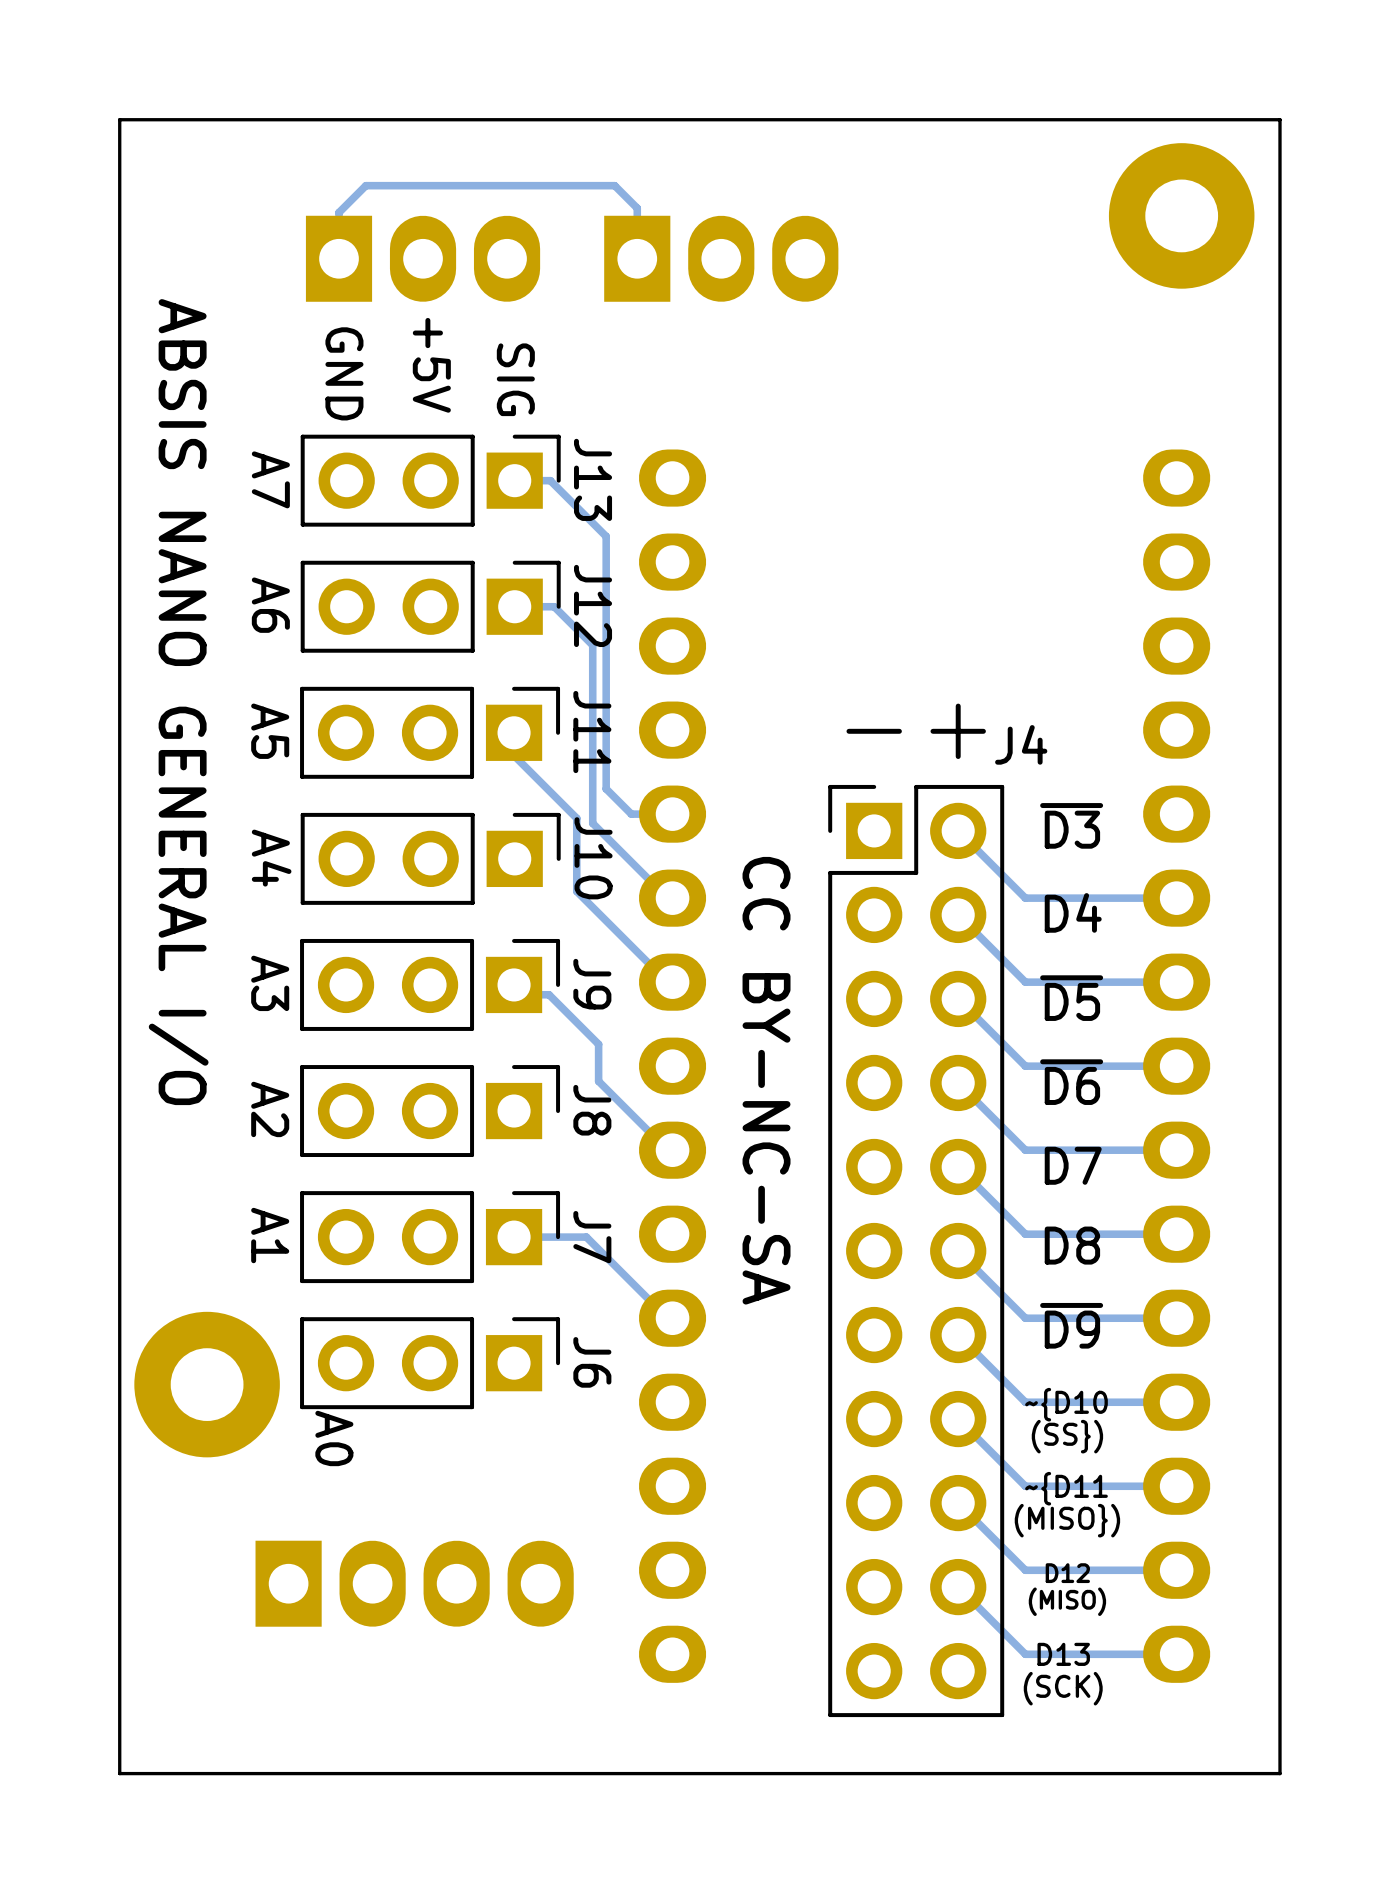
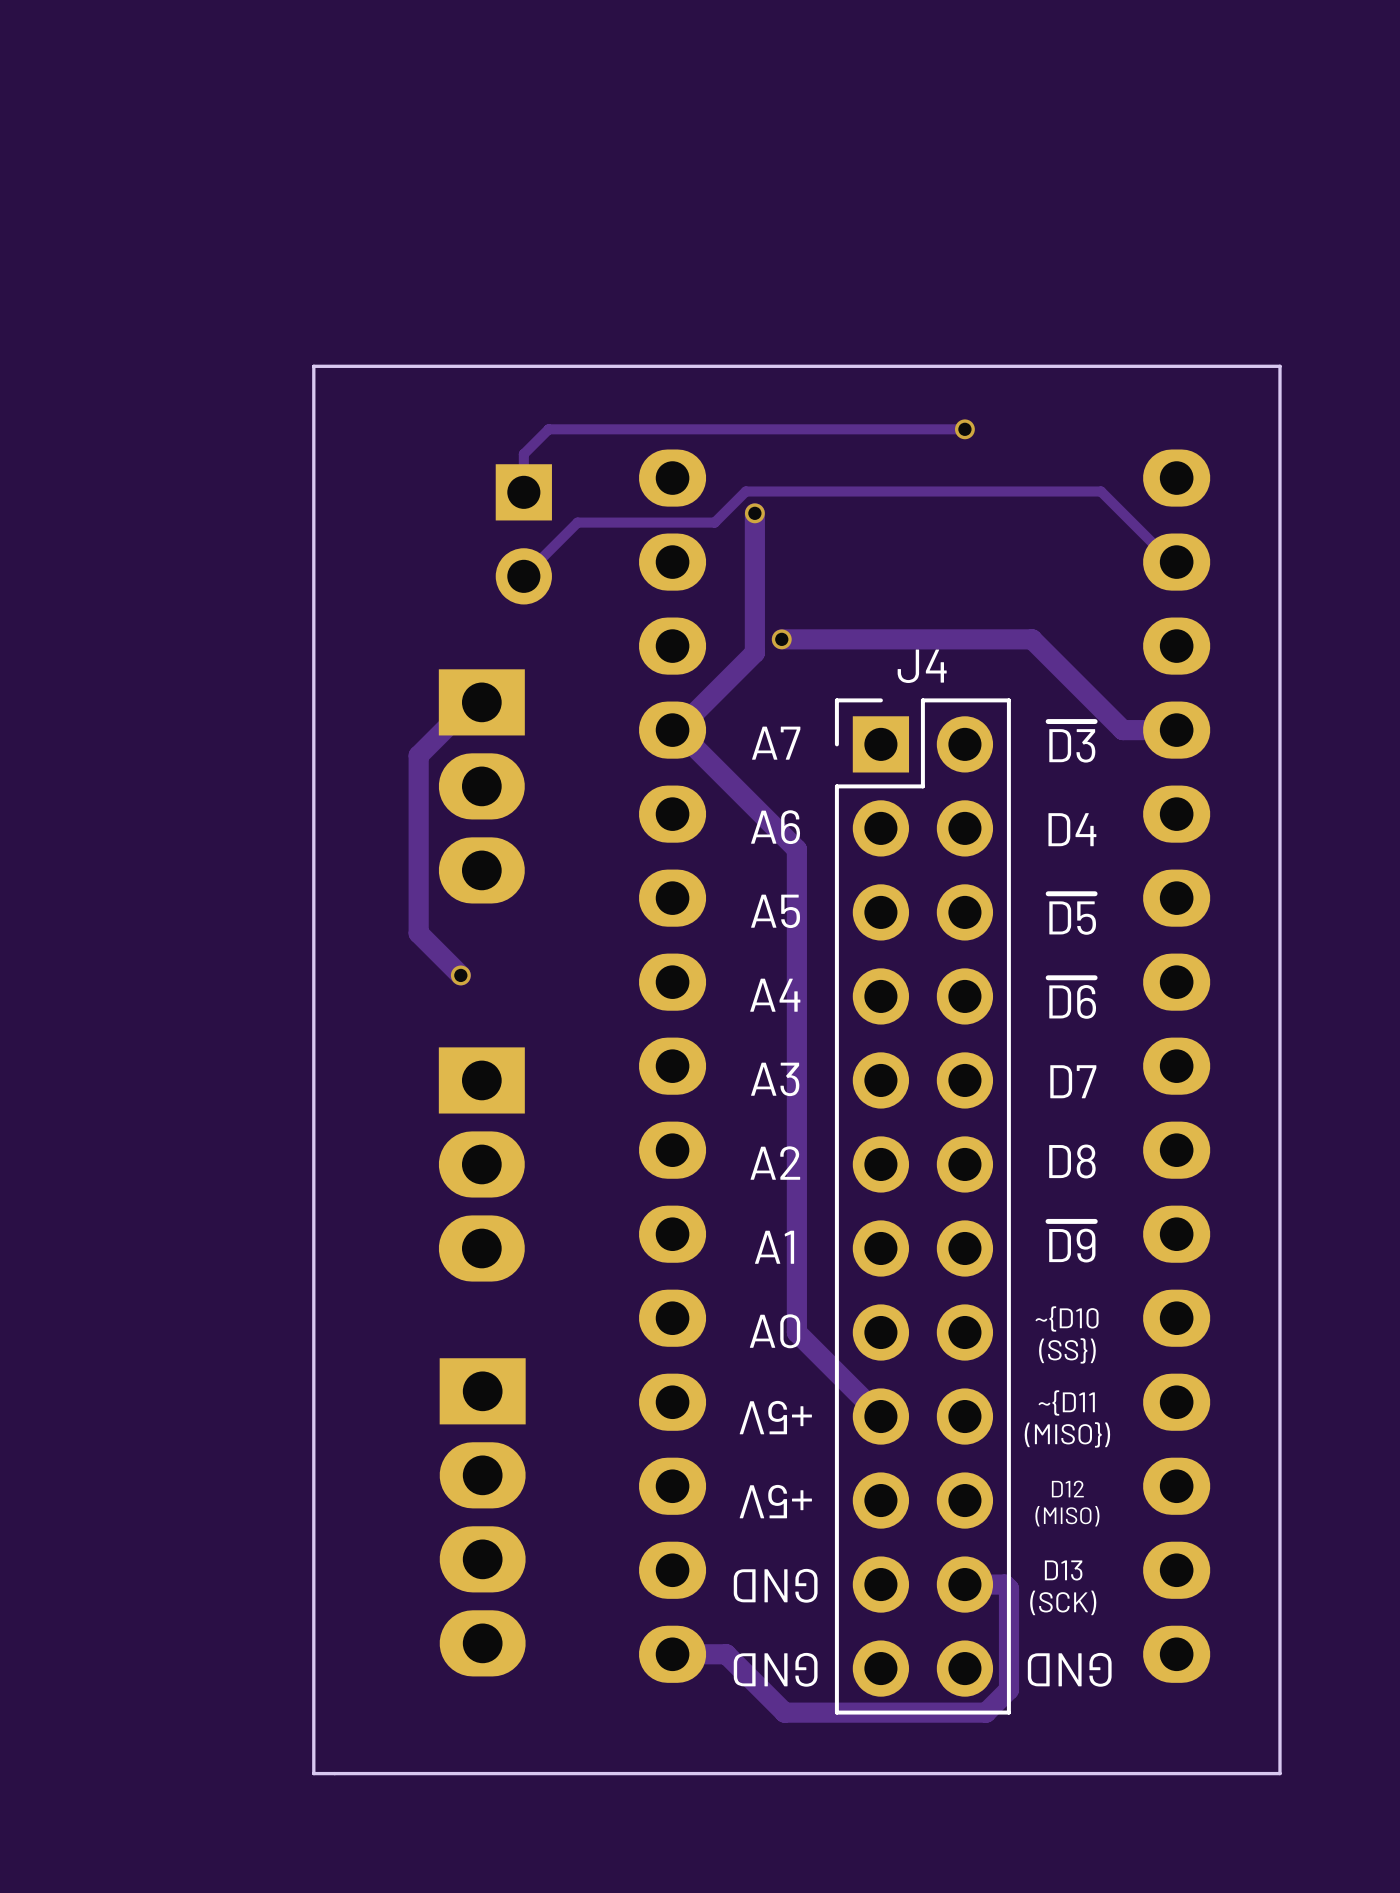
part: (1181, 215) -> none
part: (423, 258) -> none
track: (637, 258) (637, 208) (614, 185) (365, 185) (339, 212) (339, 258) -> none
part: (721, 258) -> none
text: +5V (431, 365) -> none
board edge: (1279, 366) (1279, 119) (119, 119) (119, 1773) (313, 1773) -> (1279, 366) (313, 366) (313, 1773)
text: GND (344, 373) -> none
text: SIG (515, 379) -> none
track: none -> (964, 429) (548, 429) (523, 454) (523, 492)
via: none -> (964, 429)
J13: A7 (430, 480) -> none
track: (514, 480) (550, 480) (606, 536) (606, 788) (631, 814) (672, 814) -> none
track: none -> (754, 513) (754, 652) (677, 730) (796, 849) (796, 1332) (880, 1416)
via: none -> (754, 513)
part: none -> (523, 534)
track: none -> (1176, 562) (1171, 562) (1101, 491) (745, 491) (714, 522) (577, 522) (523, 576)
J12: A6 (430, 606) -> none
track: (514, 606) (554, 606) (592, 645) (592, 823) (667, 898) (672, 898) -> none
track: none -> (781, 639) (1032, 639) (1122, 730) (1176, 730)
via: none -> (781, 639)
text: ABSIS NANO GENERAL I/O (178, 702) -> none
track: none -> (481, 702) (471, 702) (418, 755) (418, 933) (460, 975)
text: - (874, 731) -> none
text: + (958, 731) -> none
J11: A5 (430, 732) -> none
track: (514, 732) (514, 755) (576, 818) (576, 891) (667, 982) (672, 982) -> none
text: none -> ~{D3} (1071, 742)
text: none -> A7 (776, 743)
J4 name position: J4 (1021, 744) -> J4 (922, 666)
J4 footprint: [828, 784, 1005, 1718] -> [834, 698, 1011, 1715]
part: none -> (481, 786)
text: ~{D3} (1071, 825) -> D4 (1072, 829)
text: none -> A6 (775, 827)
track: (958, 830) (1025, 898) (1176, 898) -> none
J10: A4 (430, 858) -> none
text: none -> A5 (775, 911)
text: D4 (1073, 912) -> ~{D5} (1072, 914)
track: (958, 914) (1025, 982) (1176, 982) -> none
via: none -> (460, 975)
J9: A3 (430, 984) -> none
track: (514, 984) (523, 994) (549, 994) (598, 1044) (598, 1081) (667, 1150) (672, 1150) -> none
text: none -> A4 (775, 995)
track: (958, 998) (1025, 1066) (1176, 1066) -> none
text: ~{D5} (1071, 998) -> ~{D6} (1072, 998)
text: CC BY-NC-SA (766, 1080) -> A3 (775, 1079)
track: (958, 1082) (1025, 1150) (1176, 1150) -> none
text: ~{D6} (1071, 1082) -> none
J8: A2 (430, 1111) -> none
text: none -> D8 (1072, 1161)
text: none -> A2 (775, 1163)
part: none -> (481, 1164)
text position: D7 (1073, 1165) -> D7 (1073, 1081)
track: (958, 1166) (1025, 1234) (1176, 1234) -> none
J7: A1 (430, 1237) -> none
track: (514, 1237) (586, 1237) (667, 1318) (672, 1318) -> none
text: D8 (1072, 1245) -> ~{D9} (1071, 1241)
text: none -> A1 (774, 1247)
track: (958, 1251) (1025, 1318) (1176, 1318) -> none
text: none -> ~{D10 (1066, 1318)
text: ~{D9} (1071, 1325) -> none
text: none -> A0 (774, 1331)
track: (958, 1335) (1025, 1402) (1176, 1402) -> none
text: none -> (SS}) (1067, 1350)
J6: A0 (430, 1363) -> none
part: (207, 1384) -> none
text: ~{D10 (1066, 1404) -> ~{D11 (1066, 1402)
text: none -> +5V (775, 1417)
track: (958, 1419) (1025, 1486) (1176, 1486) -> none
text: (SS}) (1067, 1436) -> (MISO}) (1067, 1434)
text: ~{D11 (1066, 1488) -> D12 (1067, 1489)
text: none -> +5V (775, 1501)
track: (958, 1503) (1025, 1570) (1176, 1570) -> none
text: (MISO}) (1067, 1520) -> (MISO) (1067, 1516)
text: D12 (1067, 1573) -> none
part rotation: 0° (414, 1583) -> 90° clockwise (482, 1517)
track: none -> (964, 1584) (1004, 1584) (1009, 1588) (1009, 1689) (986, 1712) (784, 1712) (726, 1654) (672, 1654)
text: none -> GND (775, 1585)
track: (958, 1587) (1025, 1654) (1176, 1654) -> none
text: (MISO) (1067, 1601) -> none
text position: D13 (1063, 1654) -> D13 (1063, 1570)
text: none -> GND (775, 1669)
text: none -> GND (1069, 1669)
text position: (SCK) (1063, 1688) -> (SCK) (1063, 1602)

